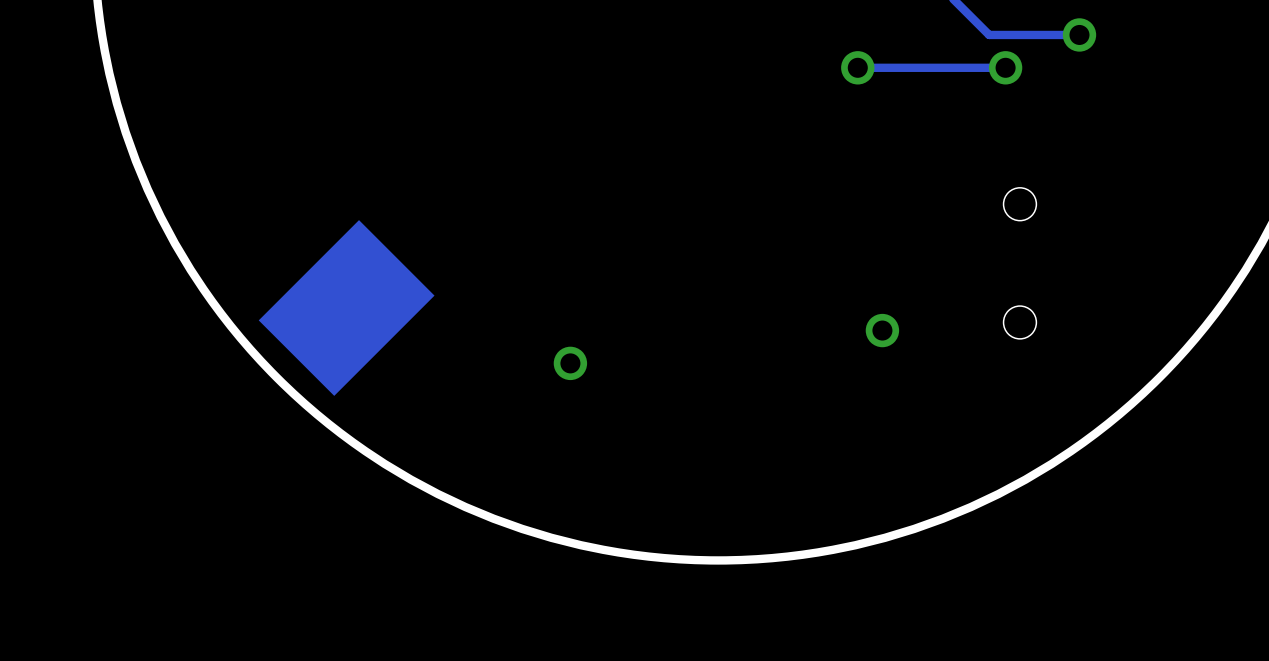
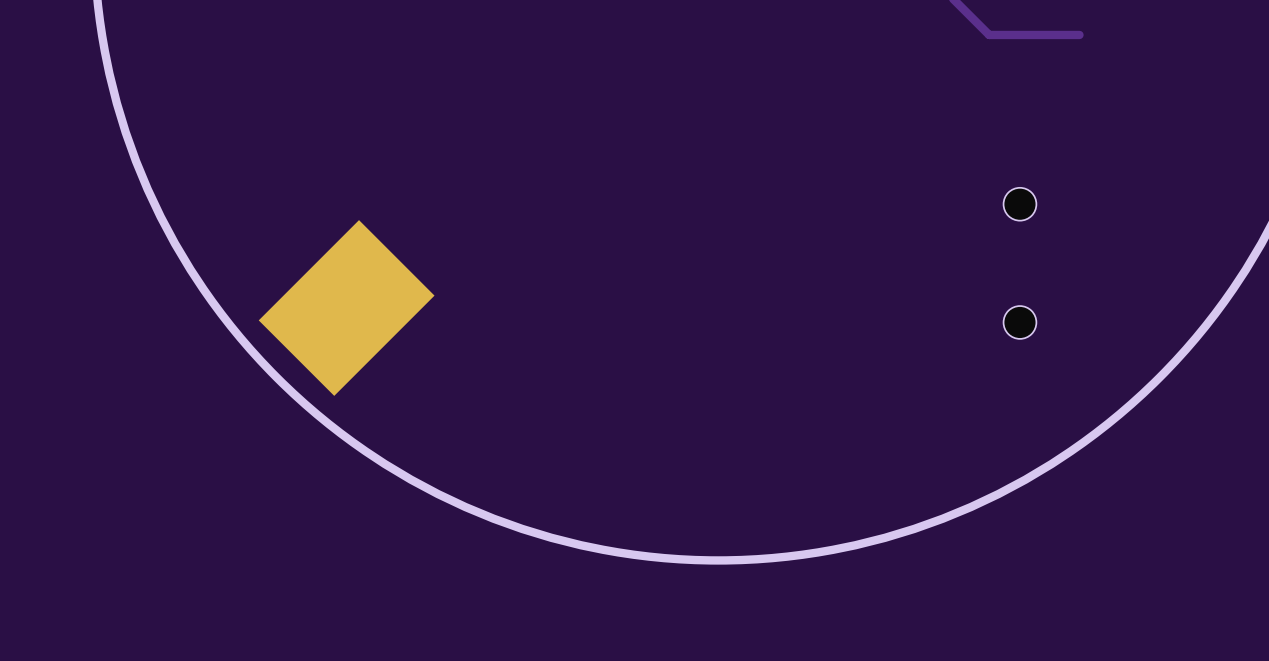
via: (1079, 34) -> none
via: (857, 67) -> none
track: (1005, 67) (857, 67) -> none
via: (1005, 67) -> none
via: (882, 330) -> none
via: (570, 363) -> none

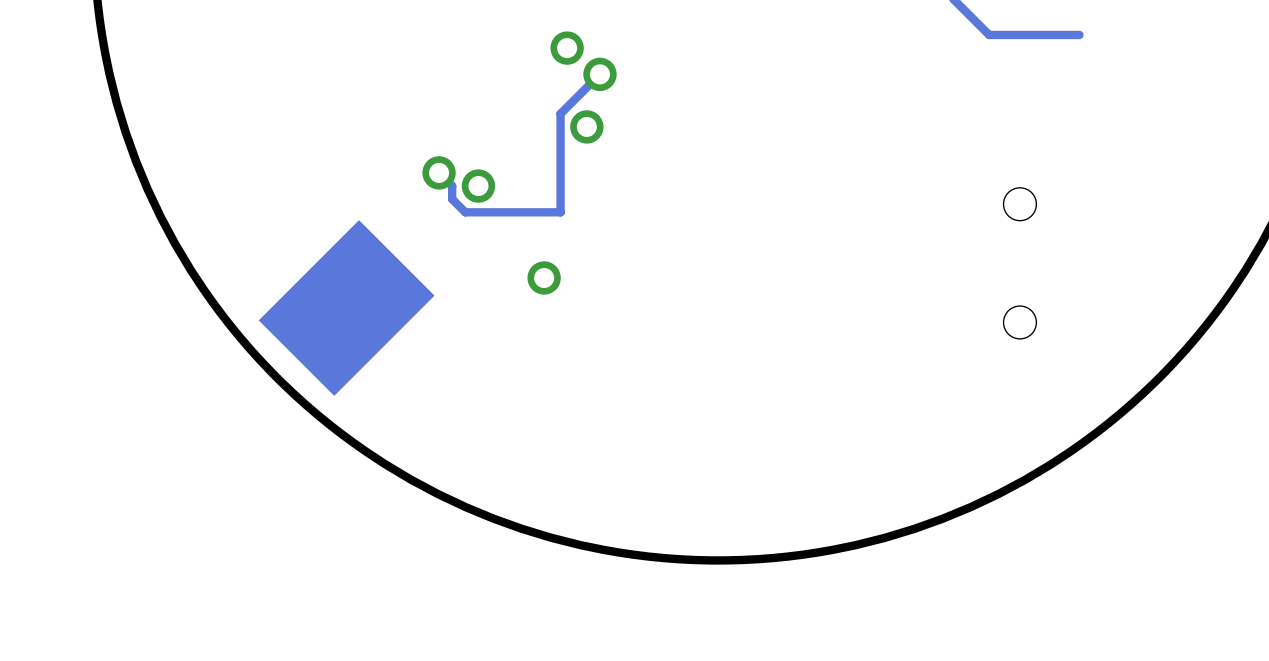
via: none -> (567, 48)
track: none -> (599, 74) (560, 113) (560, 212) (465, 212) (452, 199) (452, 186) (439, 172)
via: none -> (599, 74)
via: none -> (586, 126)
via: none -> (439, 172)
via: none -> (478, 186)
via: none -> (544, 278)

